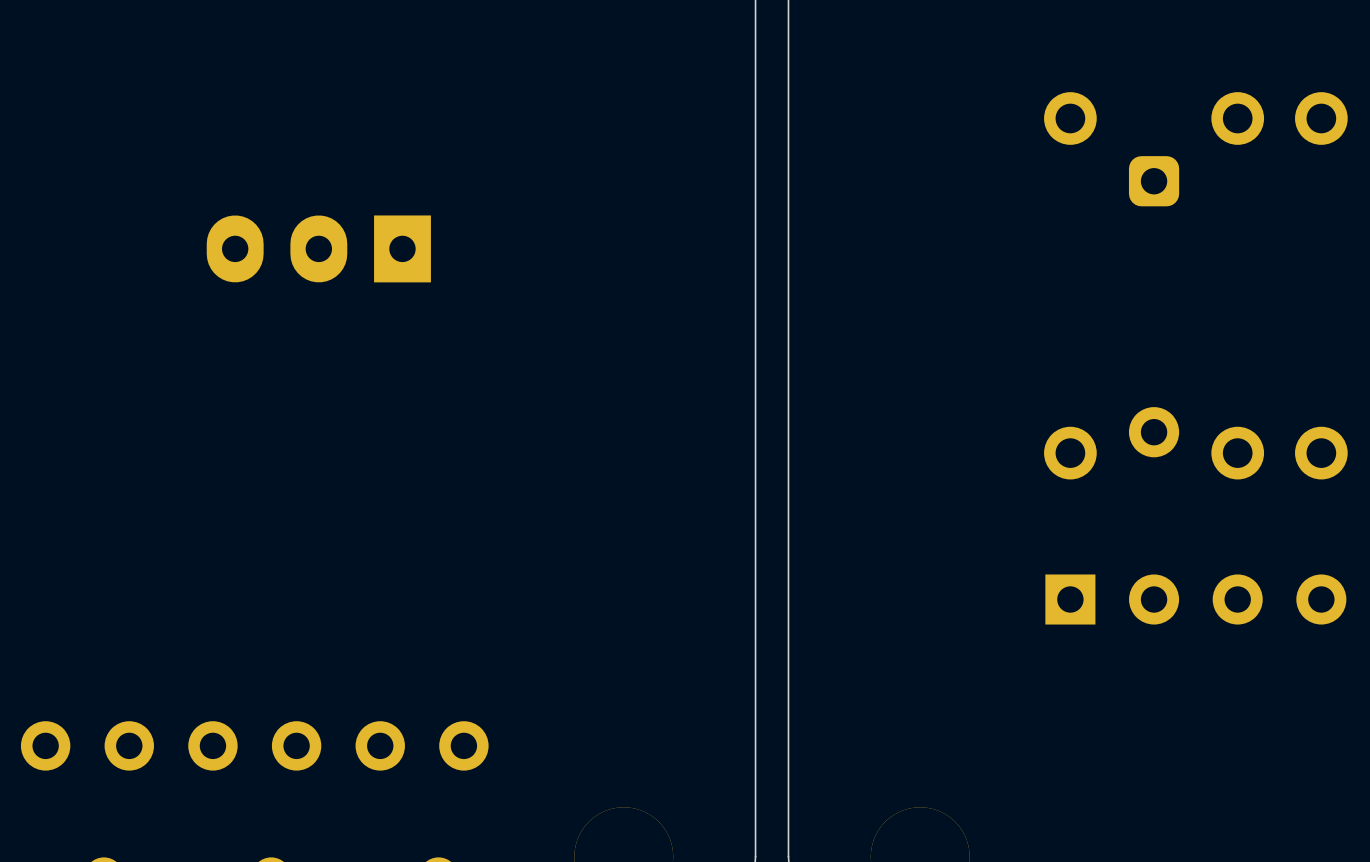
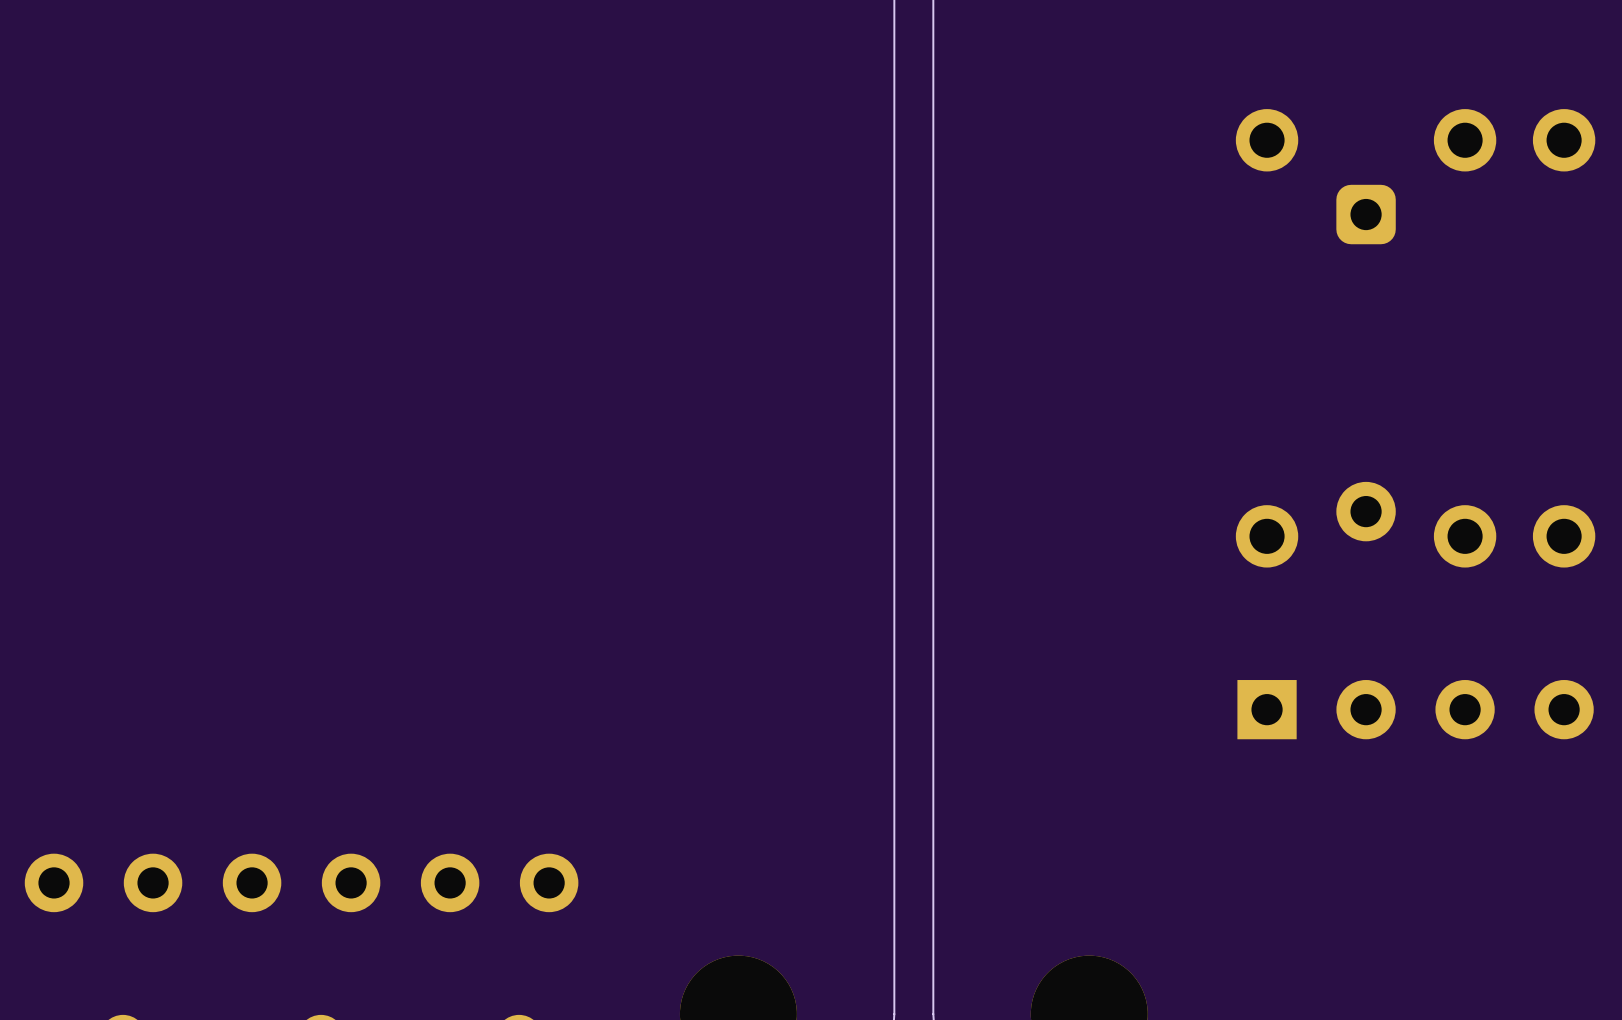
part: (318, 248) -> none

